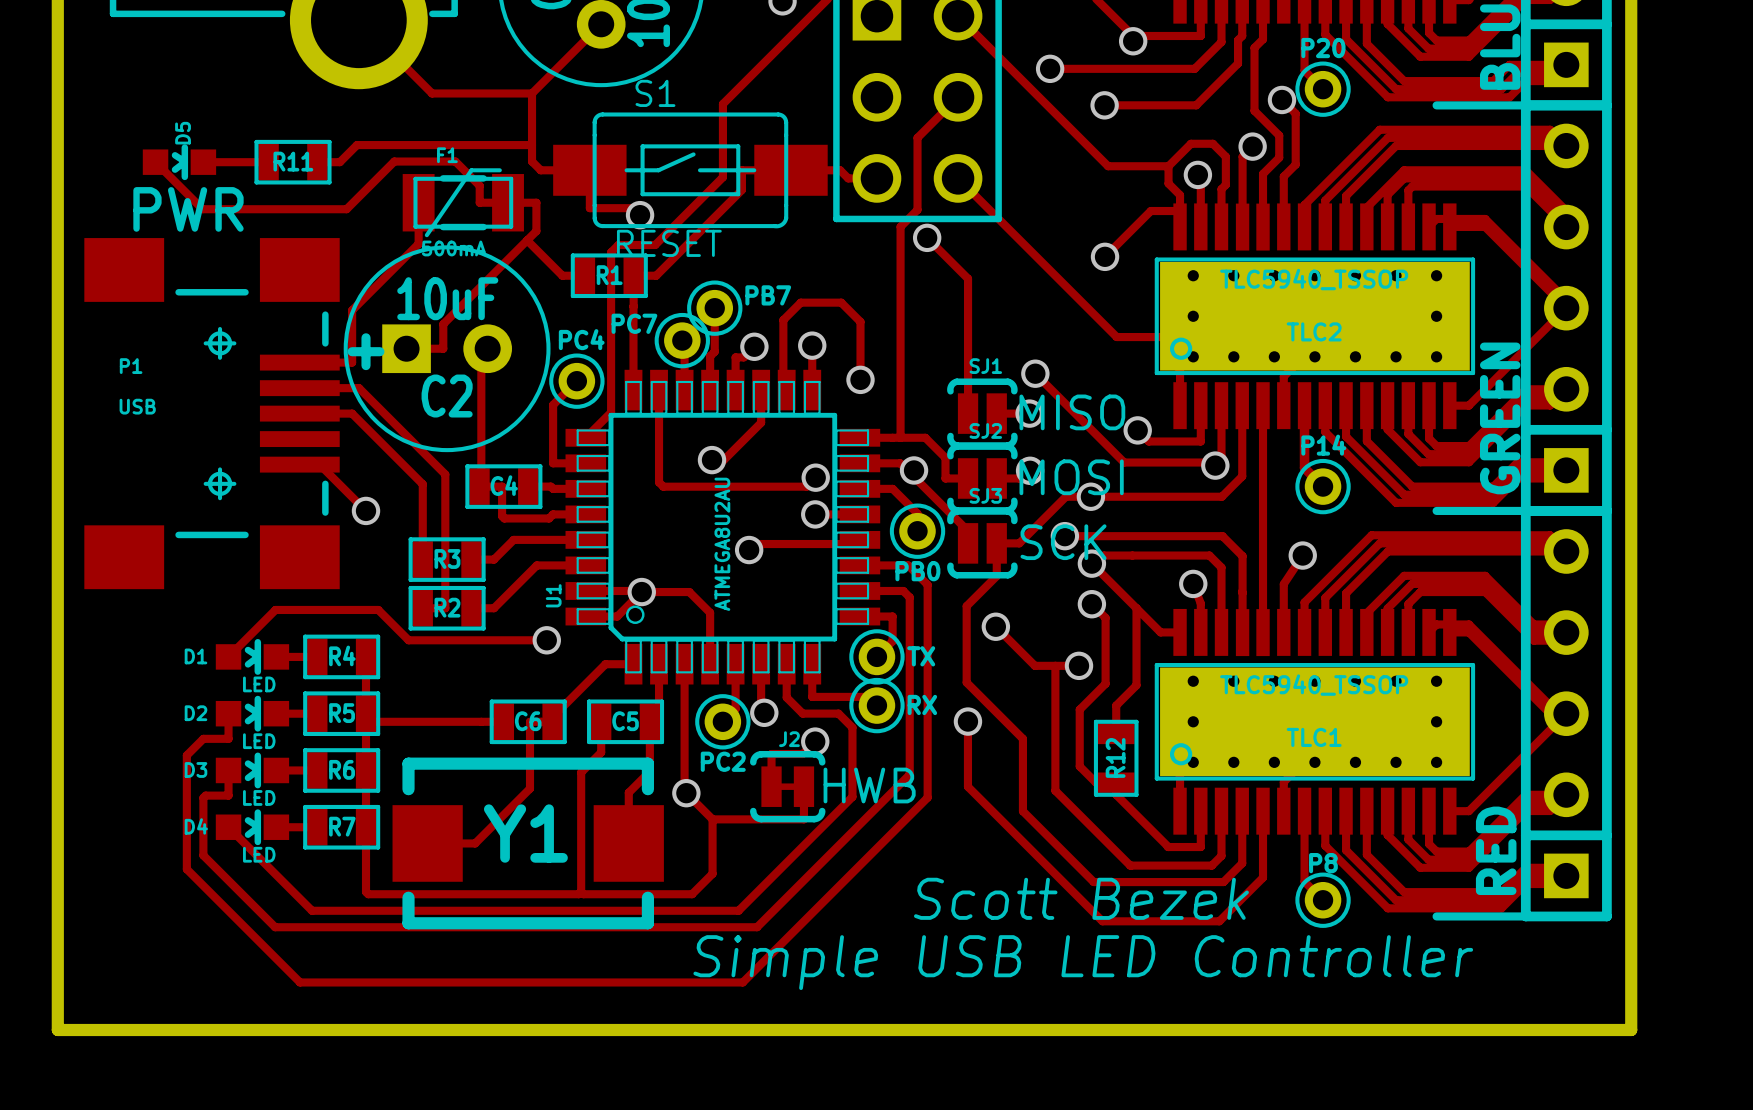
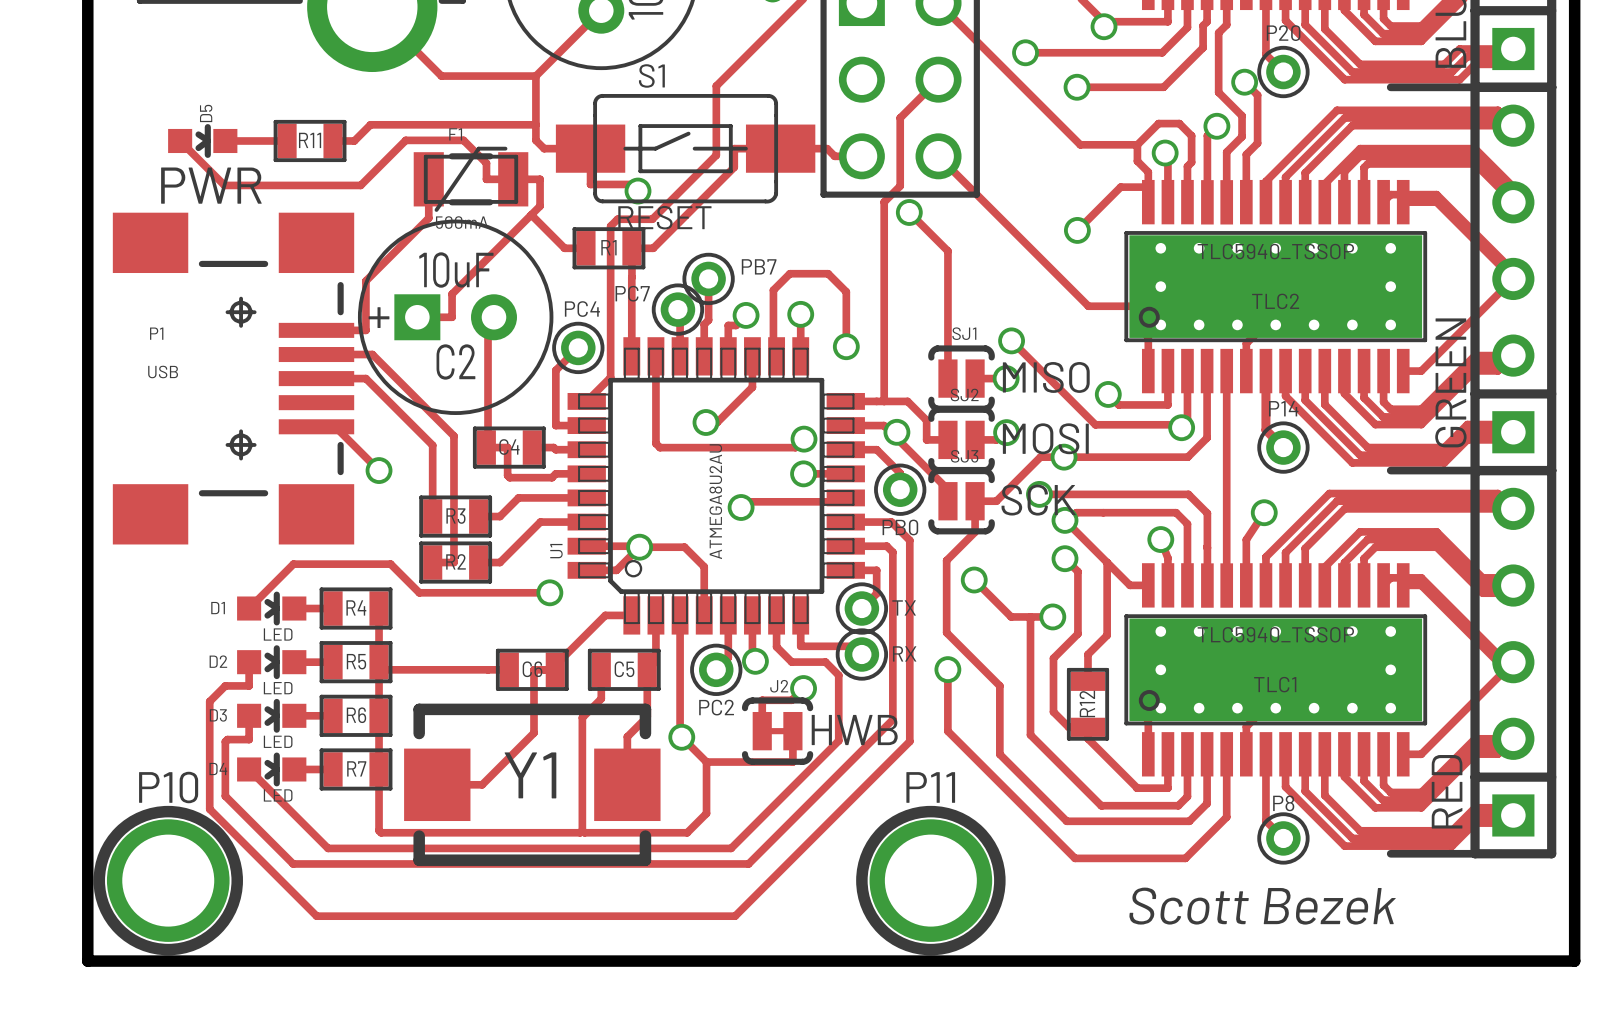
text position: Scott Bezek (1081, 898) -> Scott Bezek (1262, 906)
P10: none -> (168, 880)
P11: none -> (930, 880)
text: Simple USB LED Controller (1083, 962) -> none

